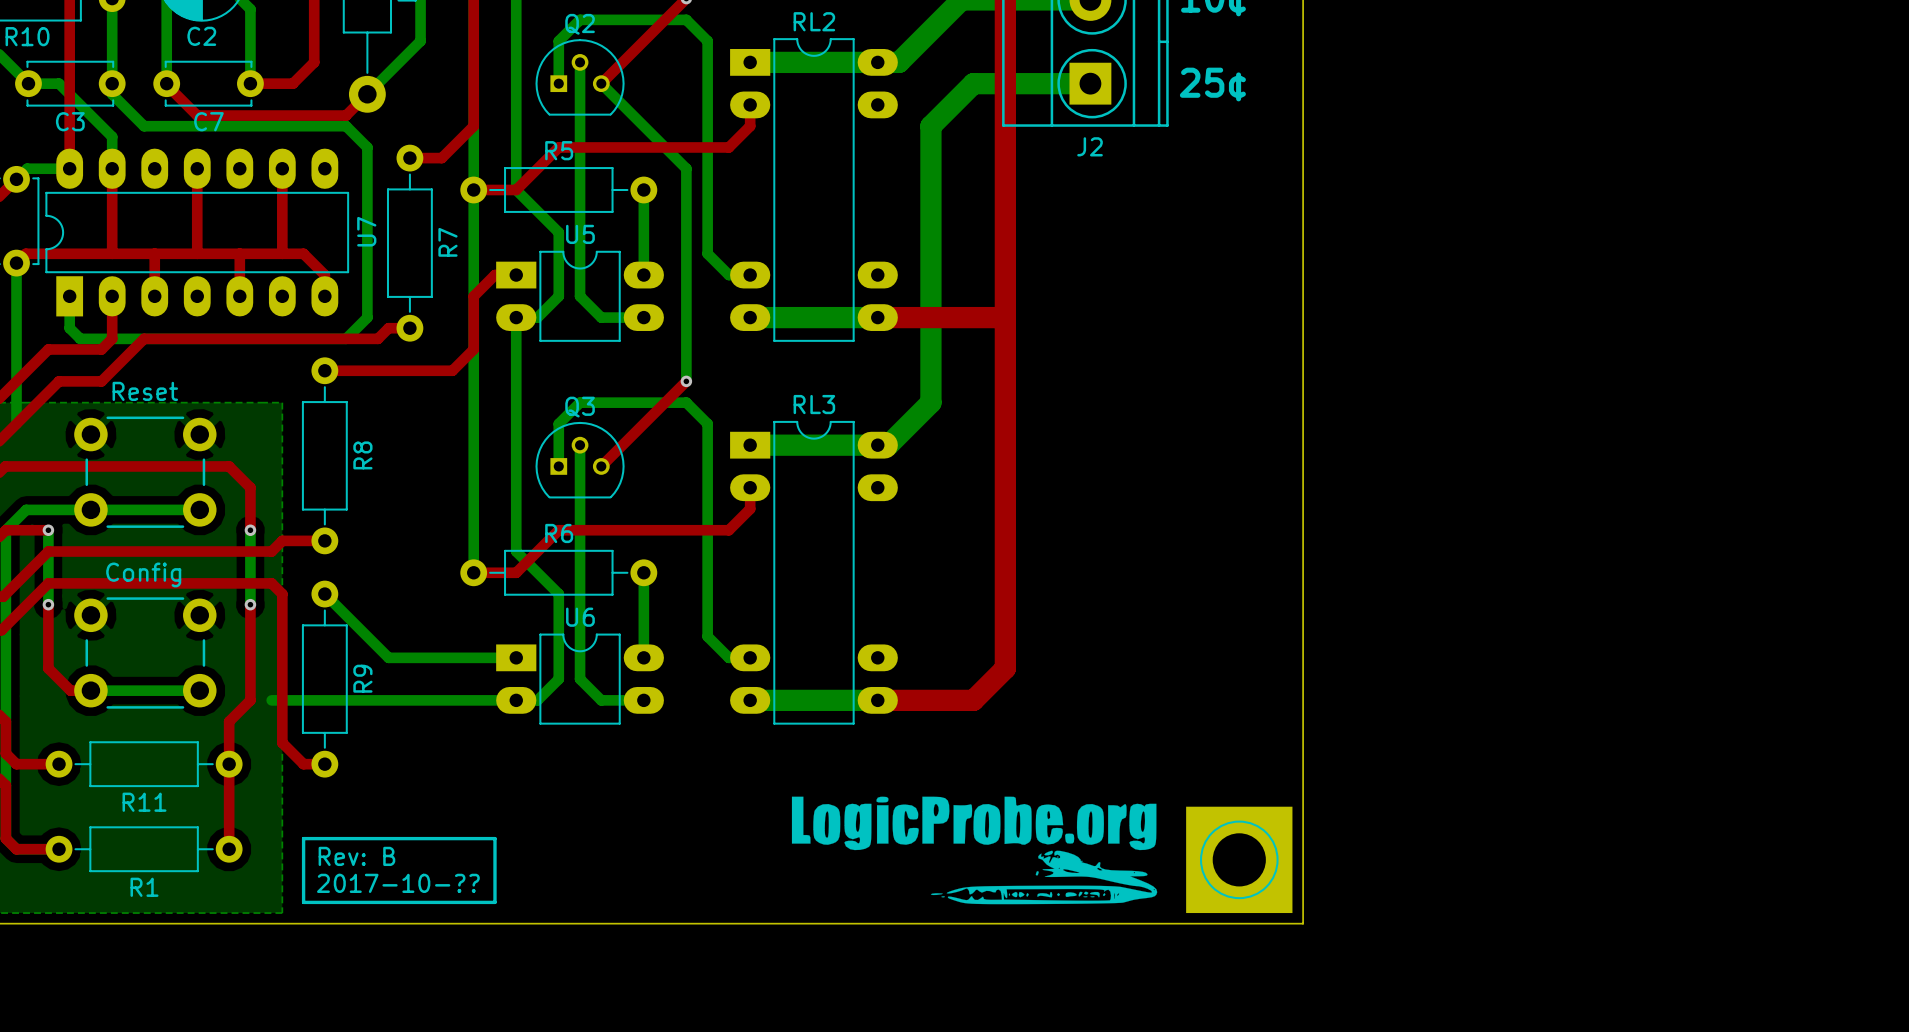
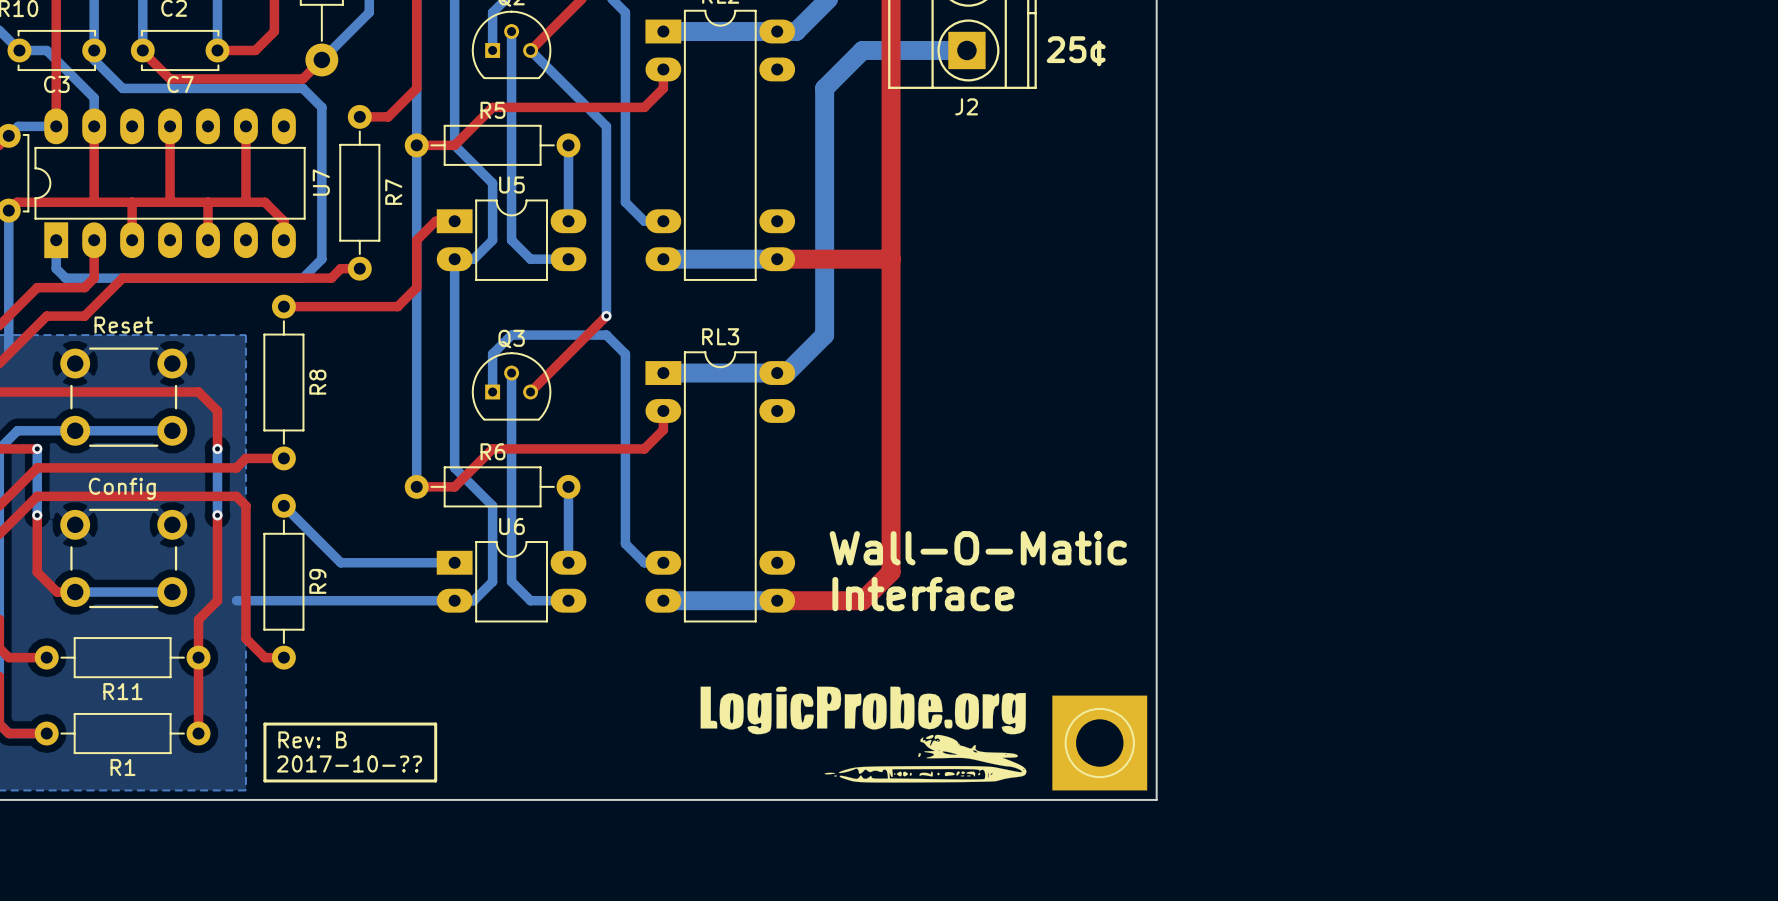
text: none -> Wall-O-Matic (978, 548)
text: none -> Interface (923, 594)

